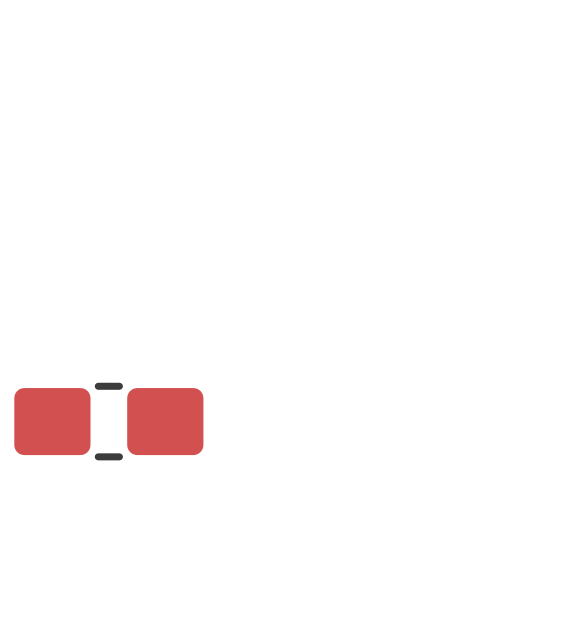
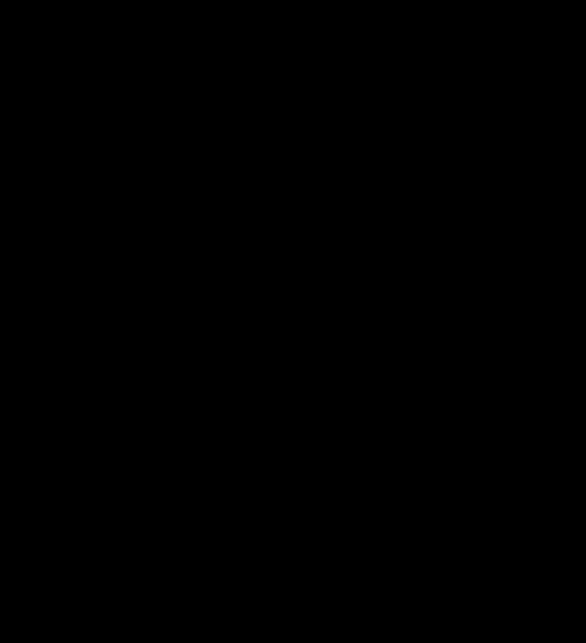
part: (108, 421) -> none

